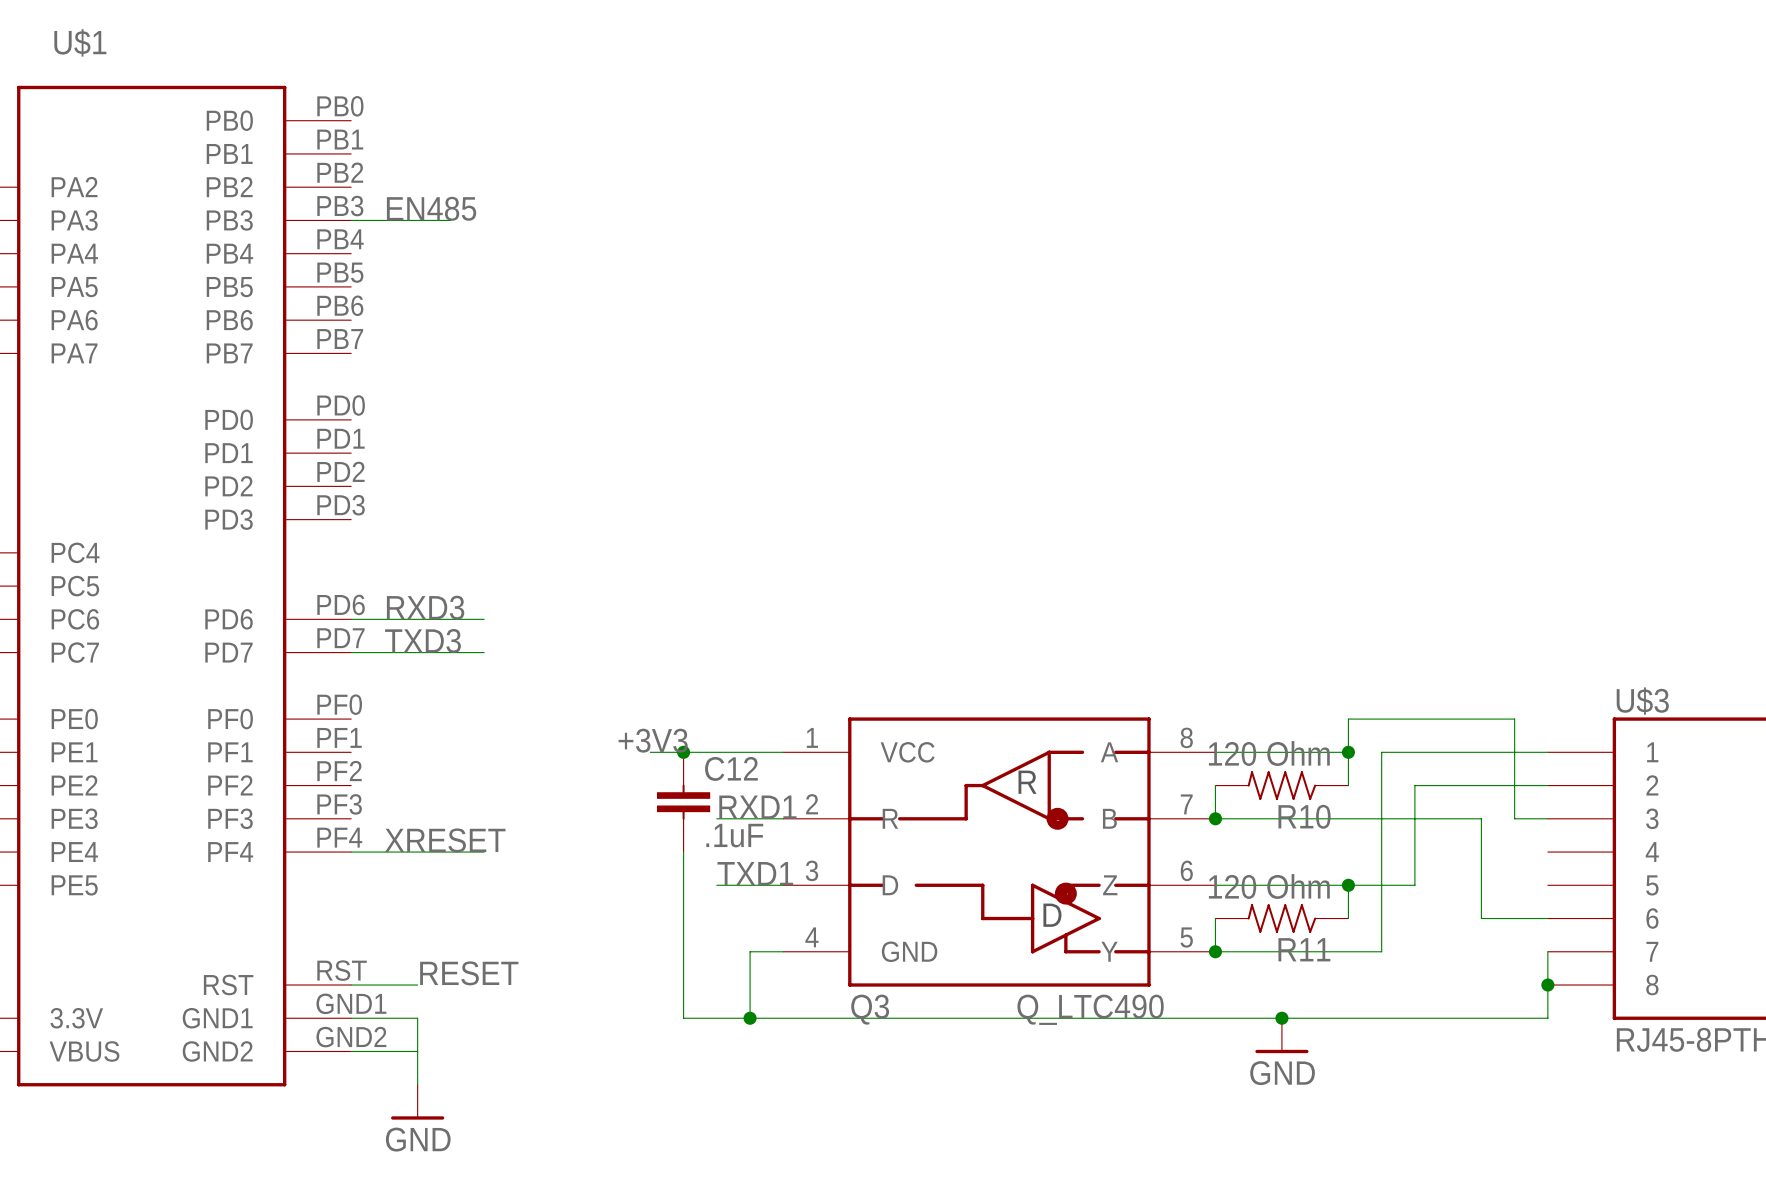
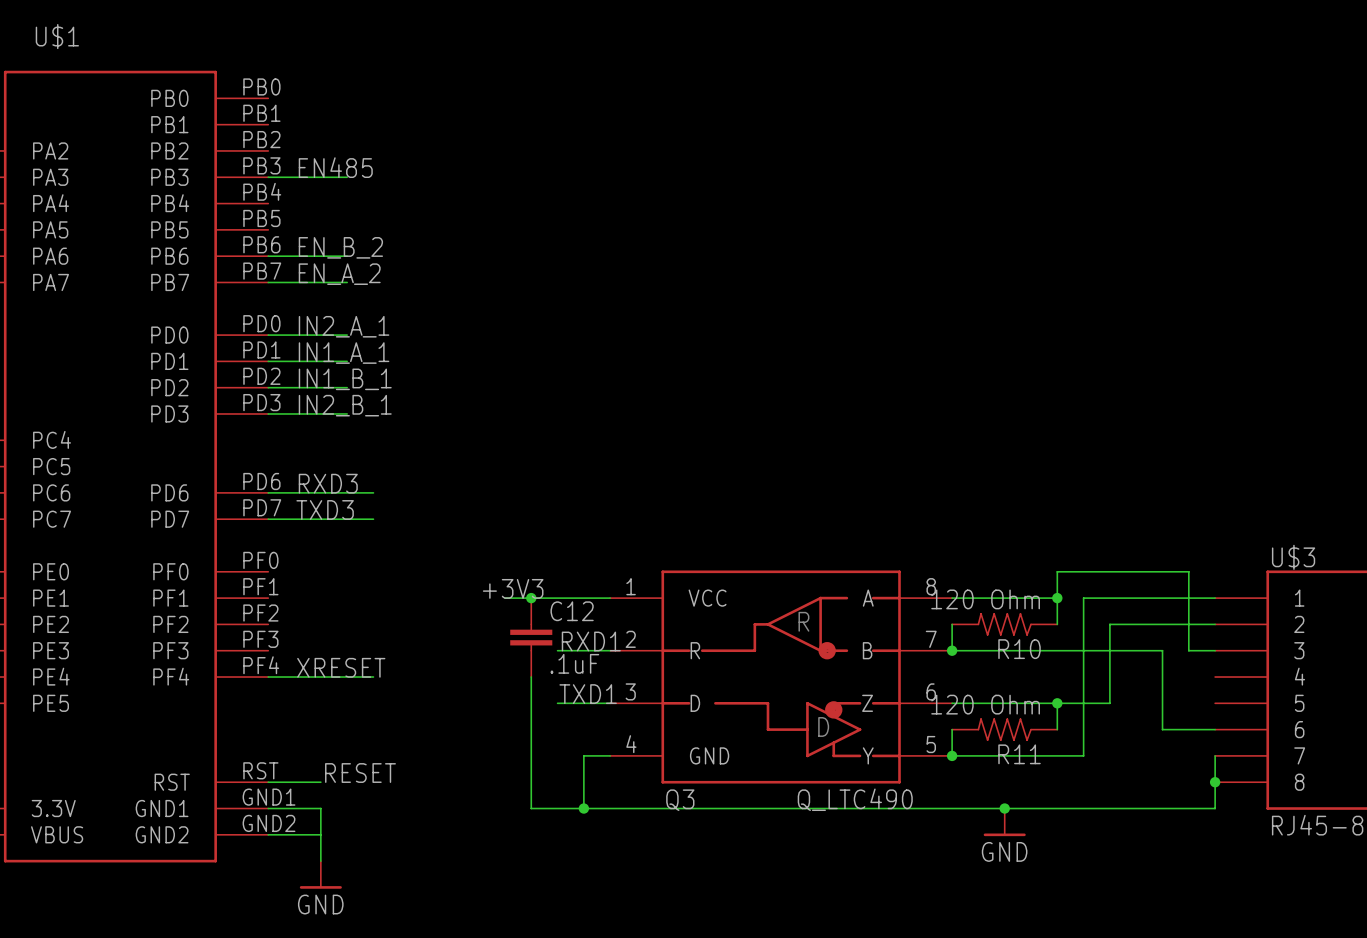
label: none -> EN_B_2 (340, 247)
wire: none -> (268, 256) (347, 256)
label: none -> EN_A_2 (339, 274)
wire: none -> (268, 282) (347, 282)
label: none -> IN2_A_1 (344, 326)
wire: none -> (268, 335) (347, 335)
label: none -> IN1_A_1 (344, 353)
wire: none -> (268, 361) (347, 361)
label: none -> IN1_B_1 (345, 379)
wire: none -> (268, 387) (347, 387)
label: none -> IN2_B_1 (345, 405)
wire: none -> (268, 413) (347, 413)

